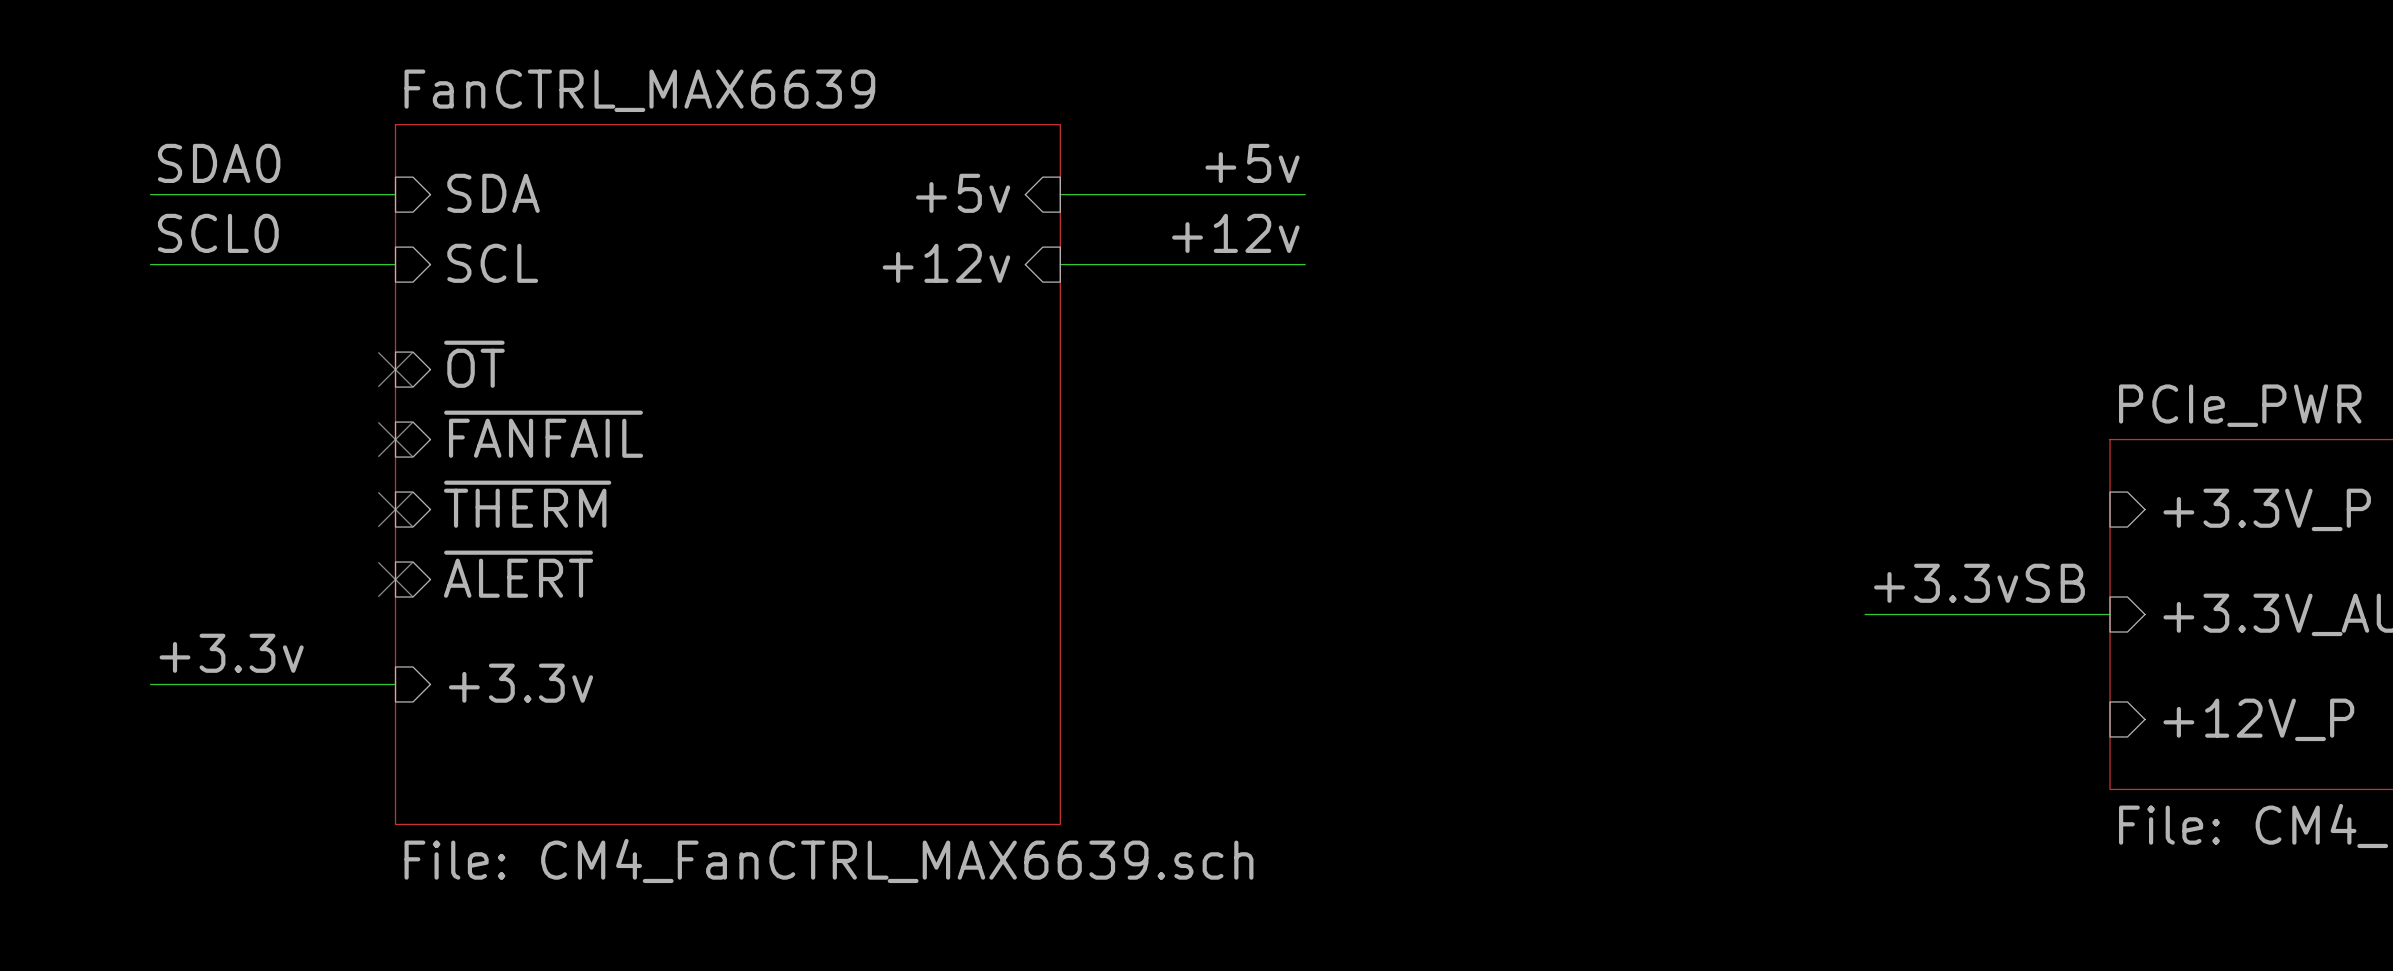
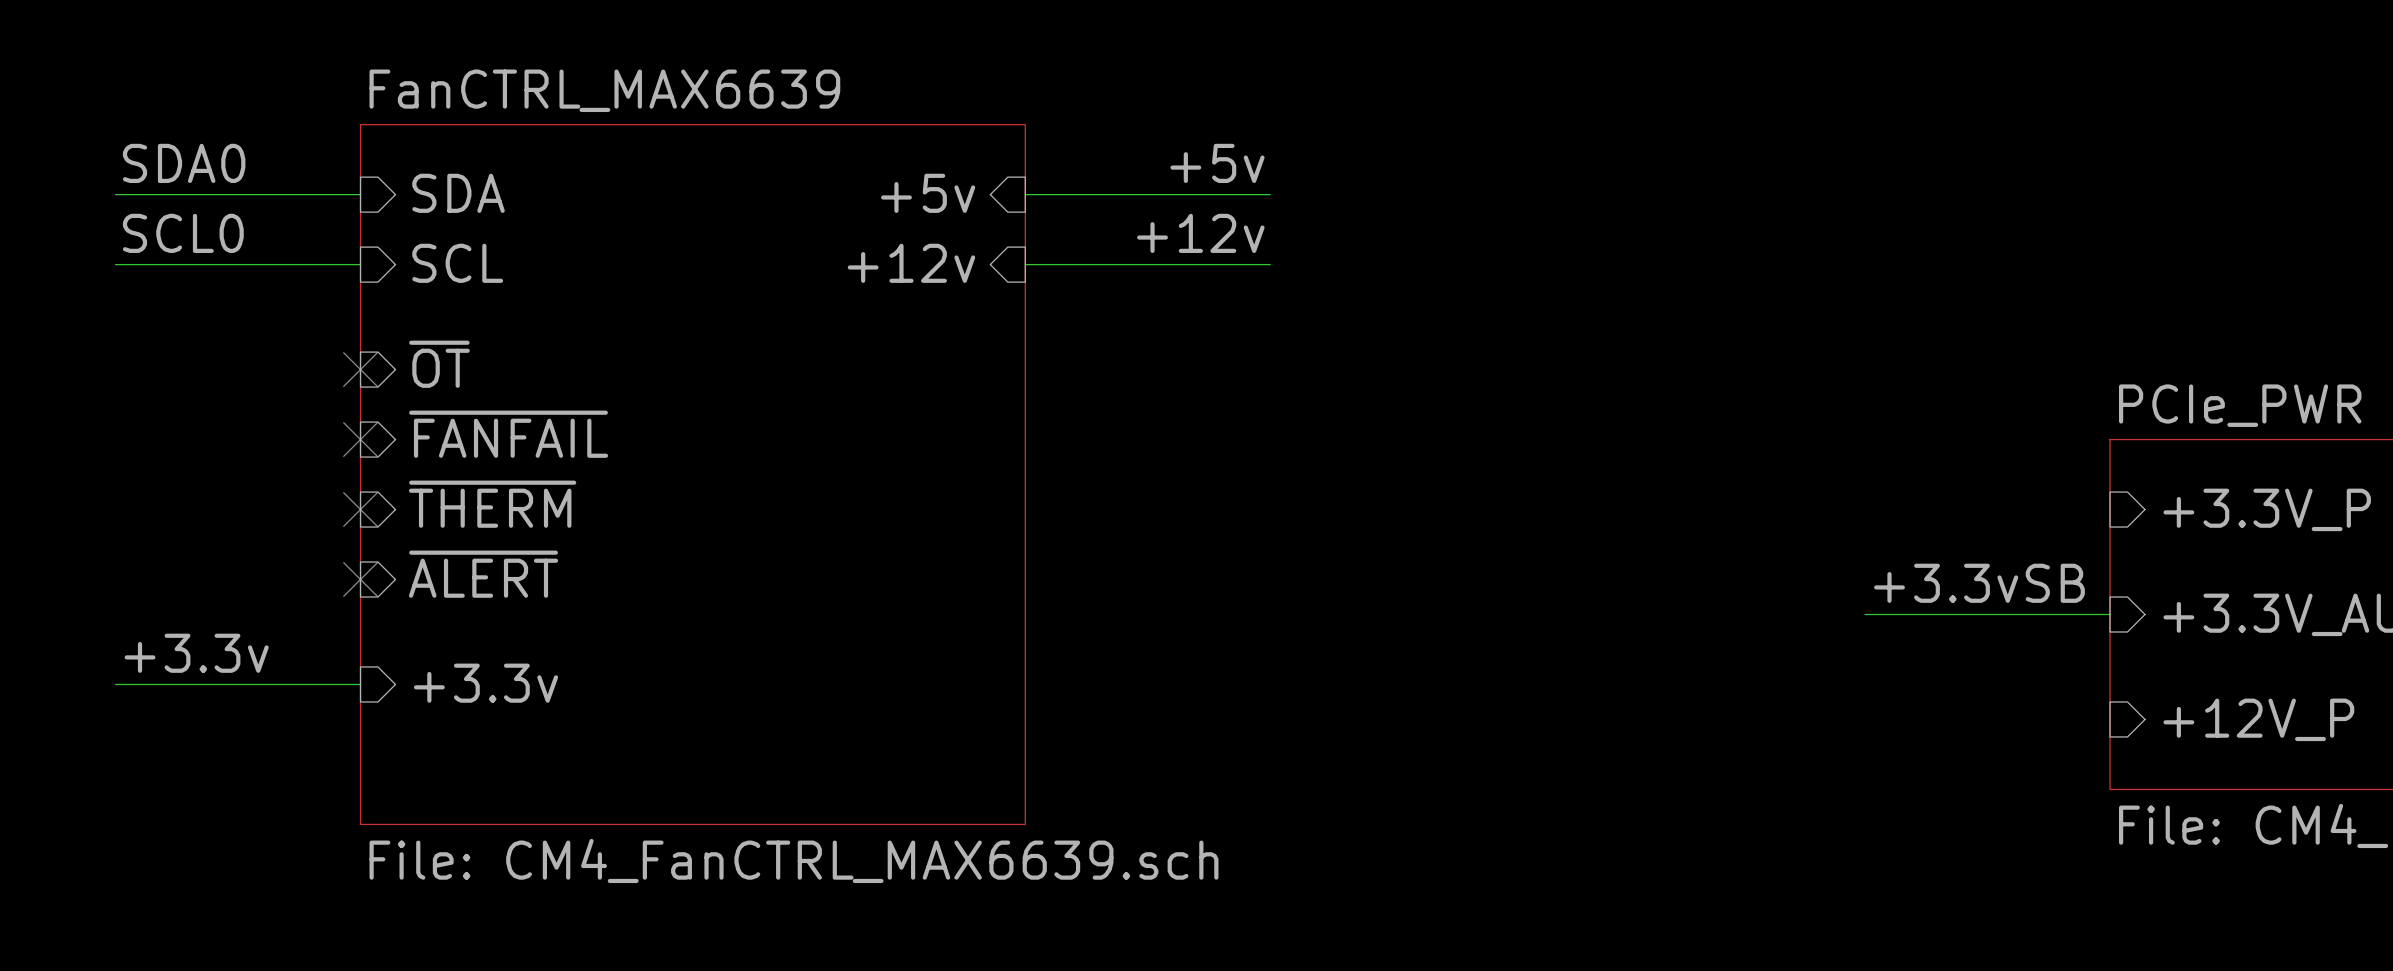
label position: SDA0 (219, 163) -> SDA0 (184, 163)
label position: +5v (1252, 163) -> +5v (1217, 163)
sheet pin position: SDA (493, 193) -> SDA (458, 193)
sheet pin position: +5v (963, 193) -> +5v (928, 193)
wire: (360, 194) (395, 194) -> (115, 194) (150, 194)
wire: (1270, 194) (1305, 194) -> (1025, 194) (1060, 194)
label position: SCL0 (218, 233) -> SCL0 (183, 233)
label position: +12v (1235, 233) -> +12v (1200, 233)
sheet pin position: SCL (492, 263) -> SCL (457, 263)
sheet pin position: +12v (946, 263) -> +12v (911, 263)
wire: (360, 264) (395, 264) -> (115, 264) (150, 264)
wire: (1270, 264) (1305, 264) -> (1025, 264) (1060, 264)
sheet pin position: ~{OT} (474, 364) -> ~{OT} (439, 364)
no-connect mark position: (395, 369) -> (360, 369)
sheet pin position: ~{FANFAIL} (543, 434) -> ~{FANFAIL} (508, 434)
no-connect mark position: (395, 439) -> (360, 439)
sheet FanCTRL_MAX6639 position: (727, 474) -> (692, 474)
sheet pin position: ~{THERM} (527, 504) -> ~{THERM} (492, 504)
no-connect mark position: (395, 509) -> (360, 509)
sheet pin position: ~{ALERT} (518, 574) -> ~{ALERT} (483, 574)
no-connect mark position: (395, 579) -> (360, 579)
label position: +3.3v (231, 653) -> +3.3v (196, 653)
sheet pin position: +3.3v (521, 683) -> +3.3v (486, 683)
wire: (360, 684) (395, 684) -> (115, 684) (150, 684)

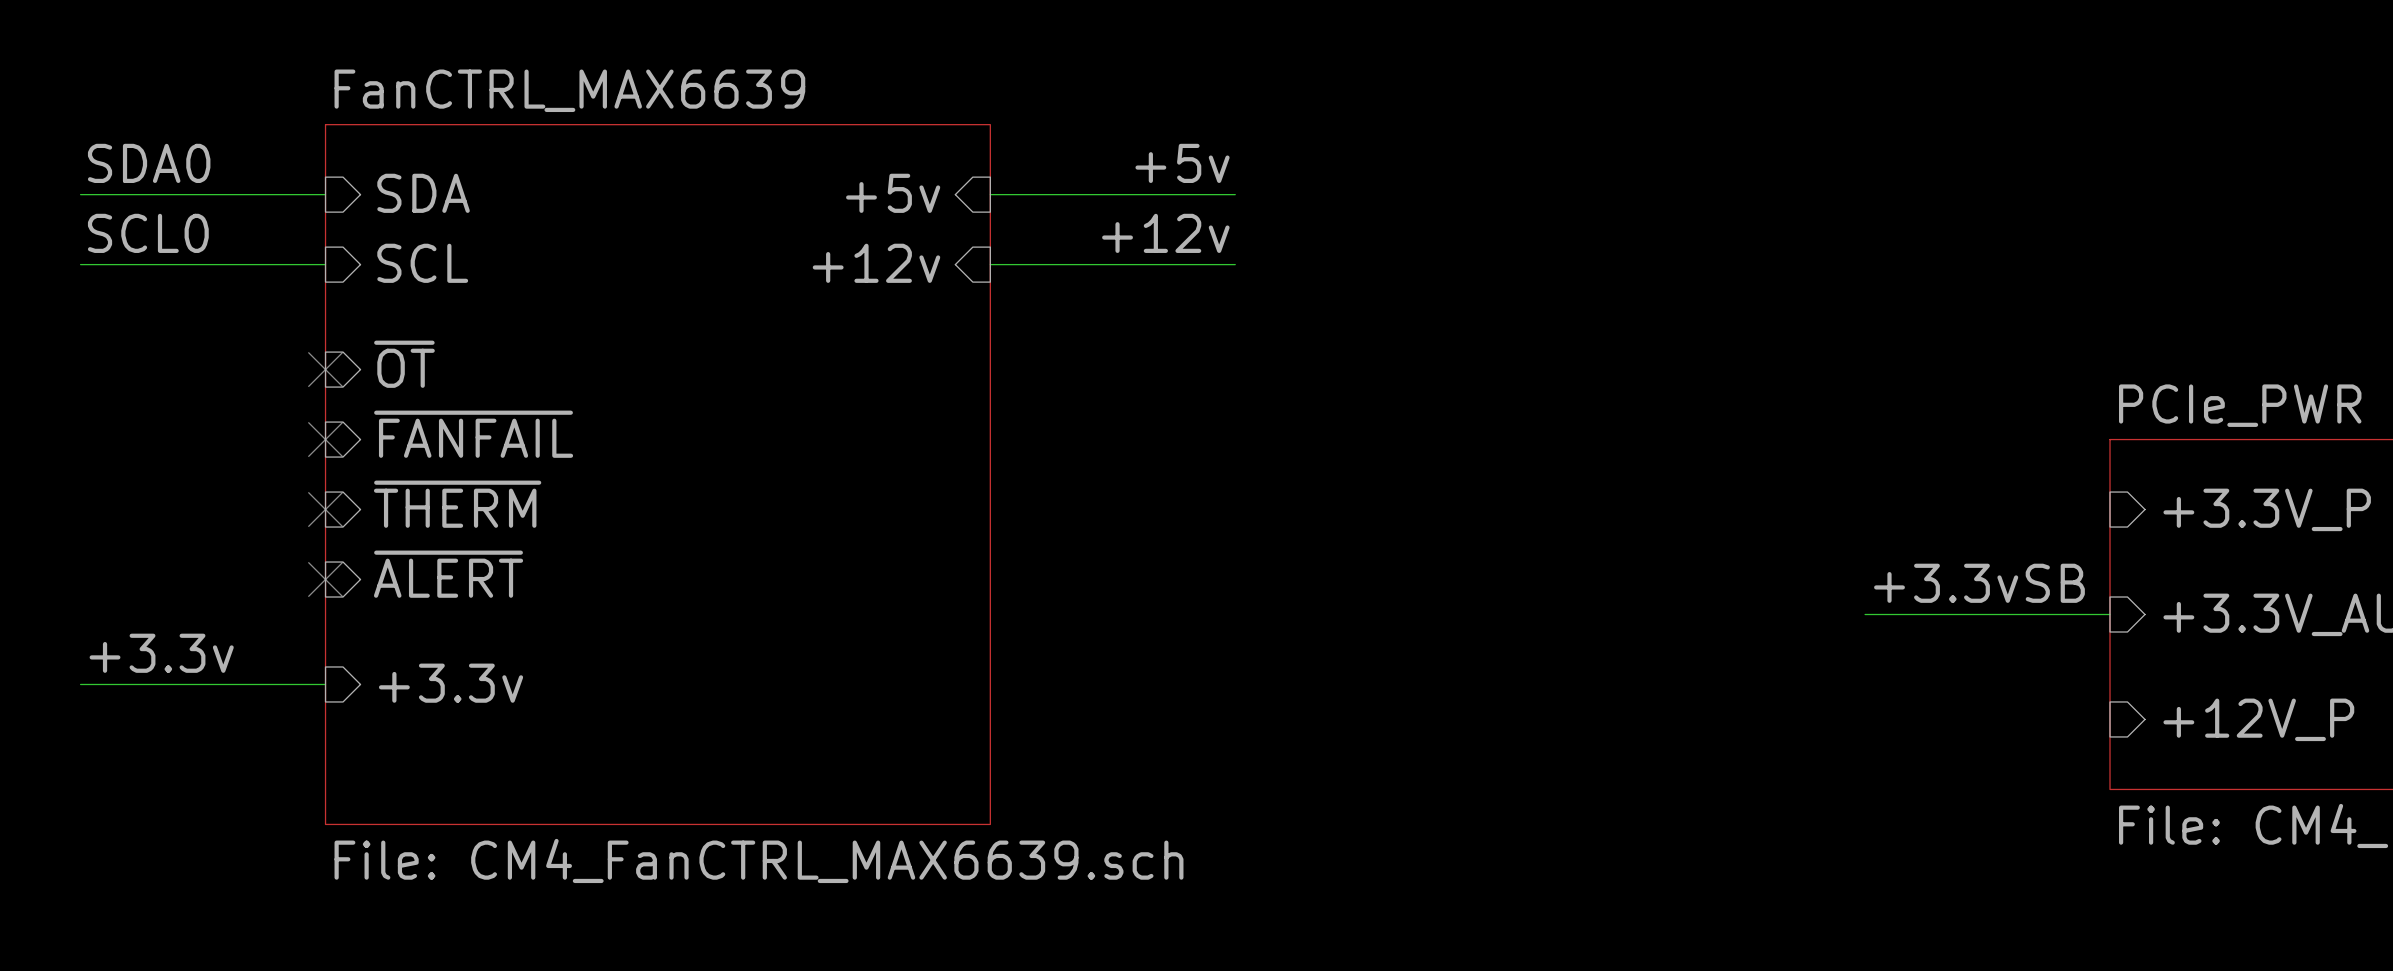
label position: SDA0 (184, 163) -> SDA0 (149, 163)
label position: +5v (1217, 163) -> +5v (1182, 163)
sheet pin position: SDA (458, 193) -> SDA (423, 193)
sheet pin position: +5v (928, 193) -> +5v (893, 193)
wire: (325, 194) (360, 194) -> (80, 194) (115, 194)
wire: (1235, 194) (1270, 194) -> (990, 194) (1025, 194)
label position: SCL0 (183, 233) -> SCL0 (148, 233)
label position: +12v (1200, 233) -> +12v (1165, 233)
sheet pin position: SCL (457, 263) -> SCL (422, 263)
sheet pin position: +12v (911, 263) -> +12v (876, 263)
wire: (325, 264) (360, 264) -> (80, 264) (115, 264)
wire: (1235, 264) (1270, 264) -> (990, 264) (1025, 264)
sheet pin position: ~{OT} (439, 364) -> ~{OT} (404, 364)
no-connect mark position: (360, 369) -> (325, 369)
sheet pin position: ~{FANFAIL} (508, 434) -> ~{FANFAIL} (473, 434)
no-connect mark position: (360, 439) -> (325, 439)
sheet FanCTRL_MAX6639 position: (692, 474) -> (657, 474)
sheet pin position: ~{THERM} (492, 504) -> ~{THERM} (457, 504)
no-connect mark position: (360, 509) -> (325, 509)
sheet pin position: ~{ALERT} (483, 574) -> ~{ALERT} (448, 574)
no-connect mark position: (360, 579) -> (325, 579)
label position: +3.3v (196, 653) -> +3.3v (161, 653)
sheet pin position: +3.3v (486, 683) -> +3.3v (451, 683)
wire: (325, 684) (360, 684) -> (80, 684) (115, 684)

